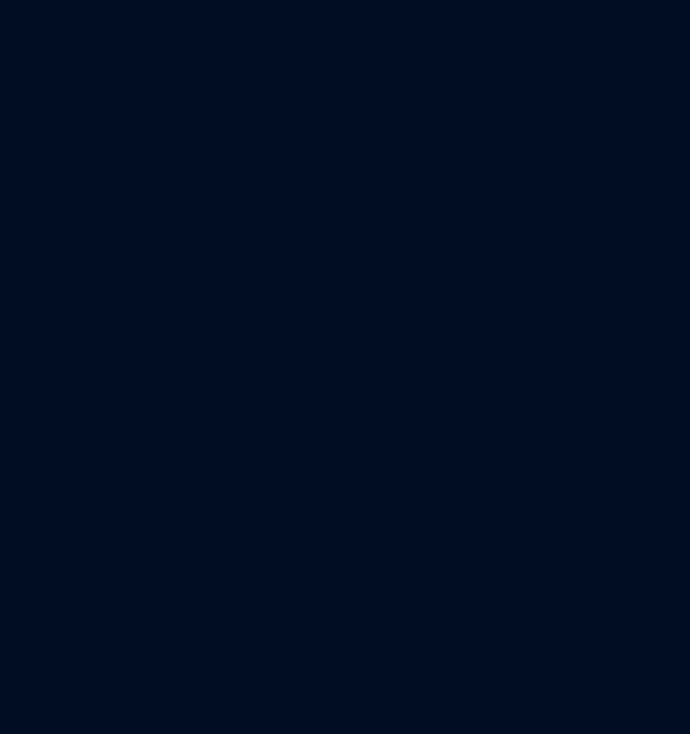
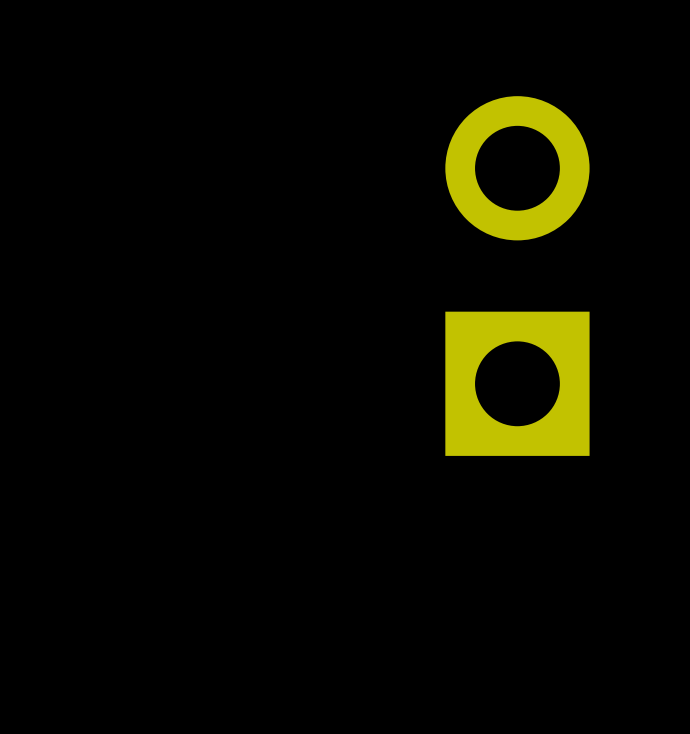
part: none -> (517, 276)

